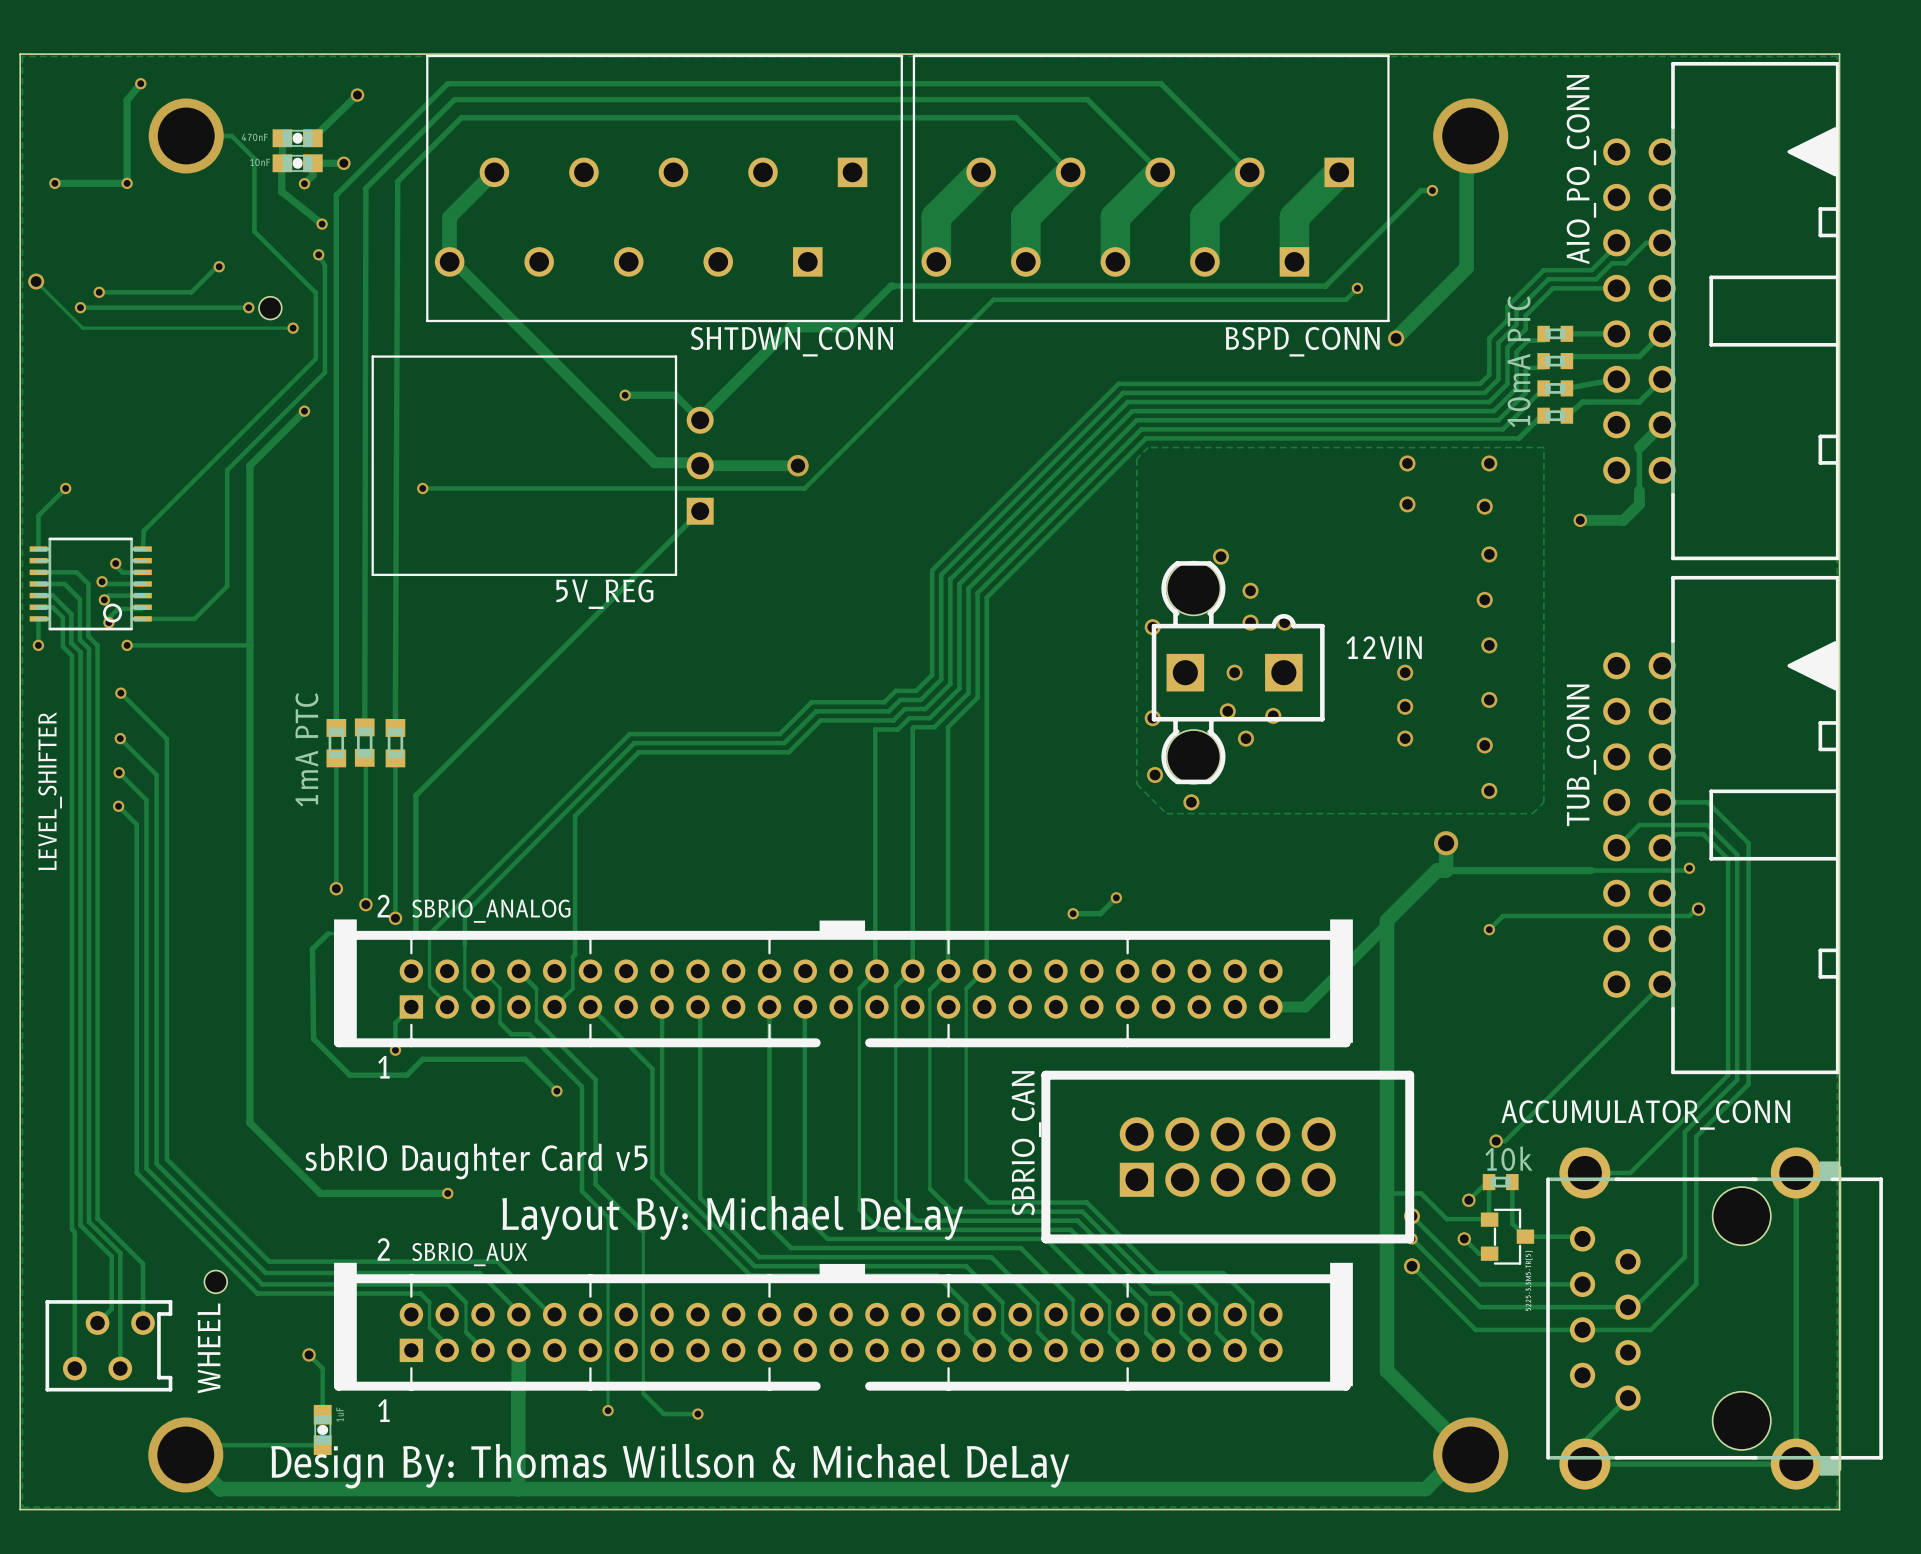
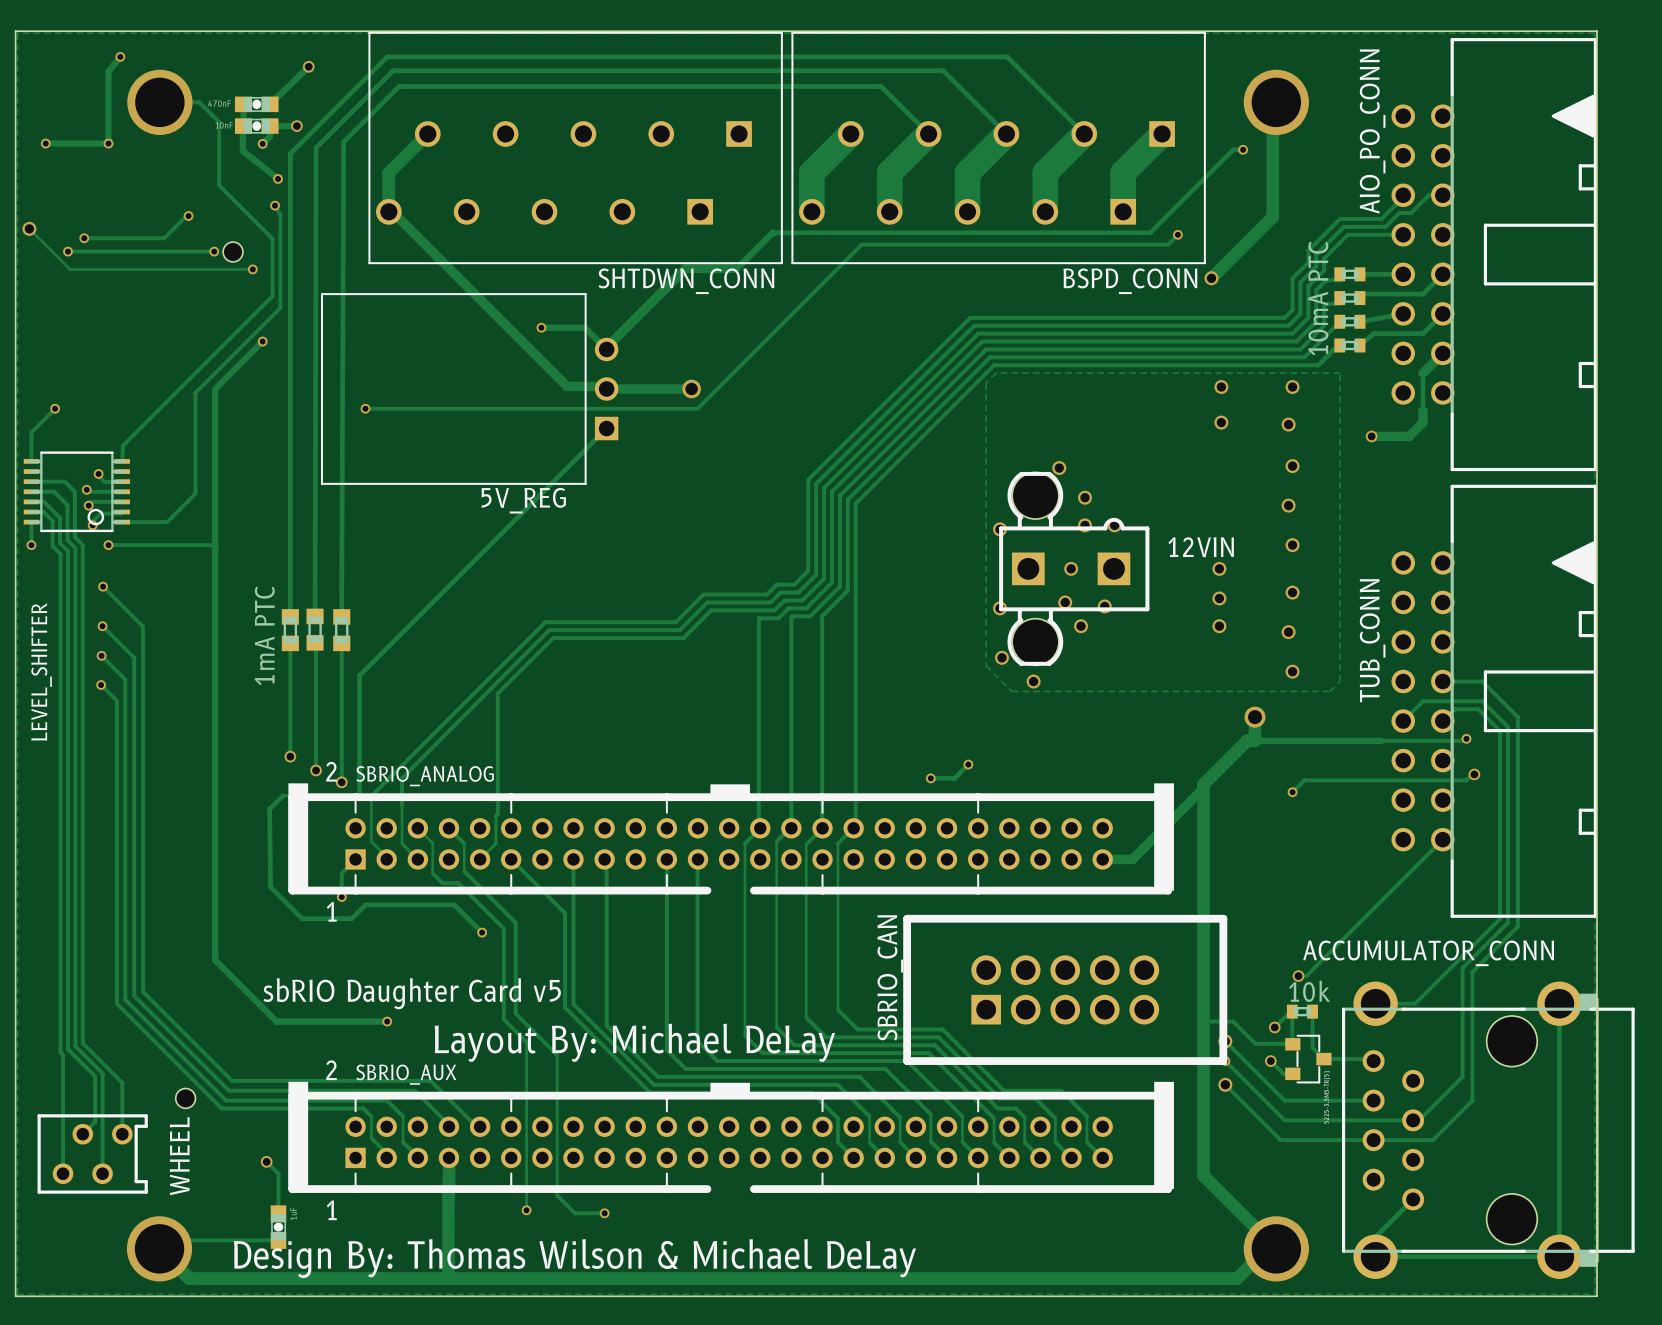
text: Design By: Thomas Willson & Michael DeLay (670, 1466) -> Design By: Thomas Wilson & Michael DeLay (574, 1258)

